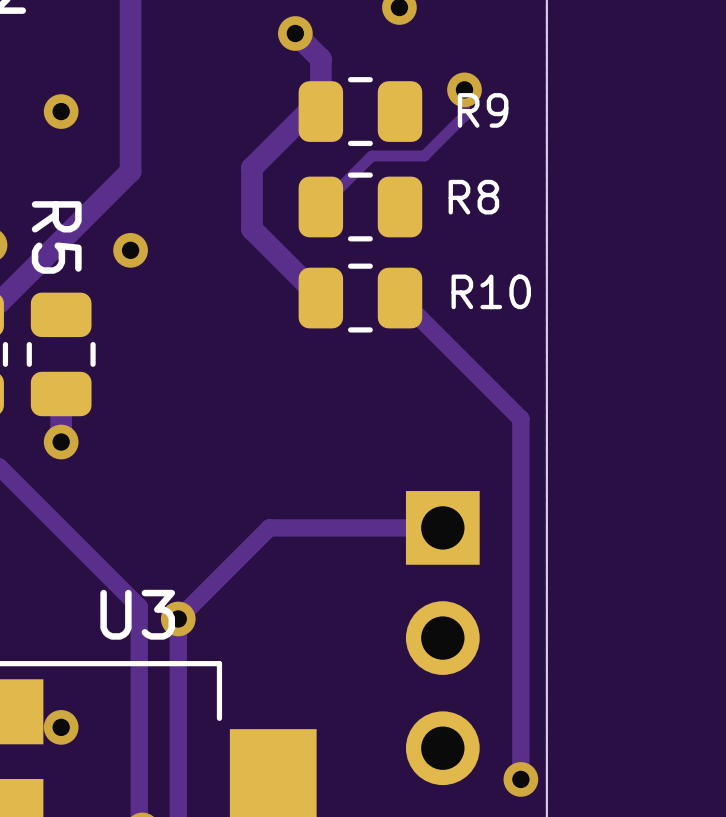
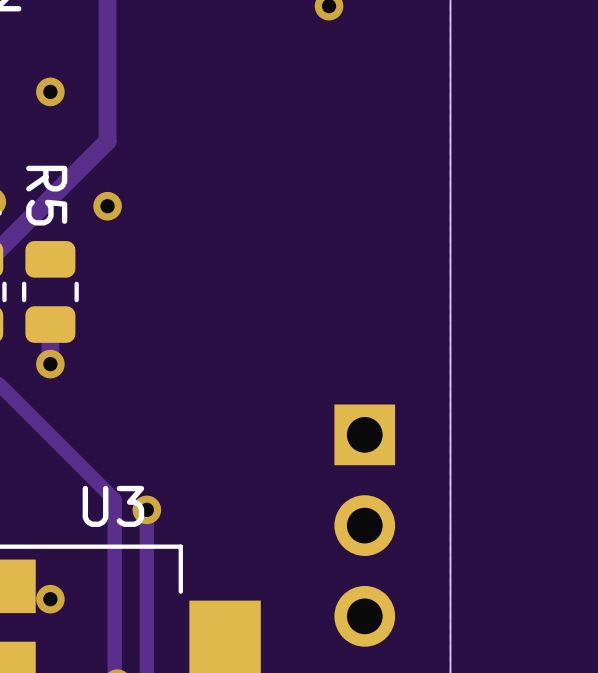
track: (295, 33) (320, 58) (320, 111) (308, 111) (252, 167) (252, 229) (320, 298) -> none
via: (295, 33) -> none
track: (464, 89) (464, 115) (424, 155) (371, 155) (320, 206) -> none
via: (464, 89) -> none
R9: (360, 111) -> none
R8: (360, 206) -> none
R10: (360, 298) -> none
track: (399, 298) (520, 418) (520, 779) -> none
track: (442, 527) (269, 527) (178, 618) -> none
via: (520, 779) -> none

